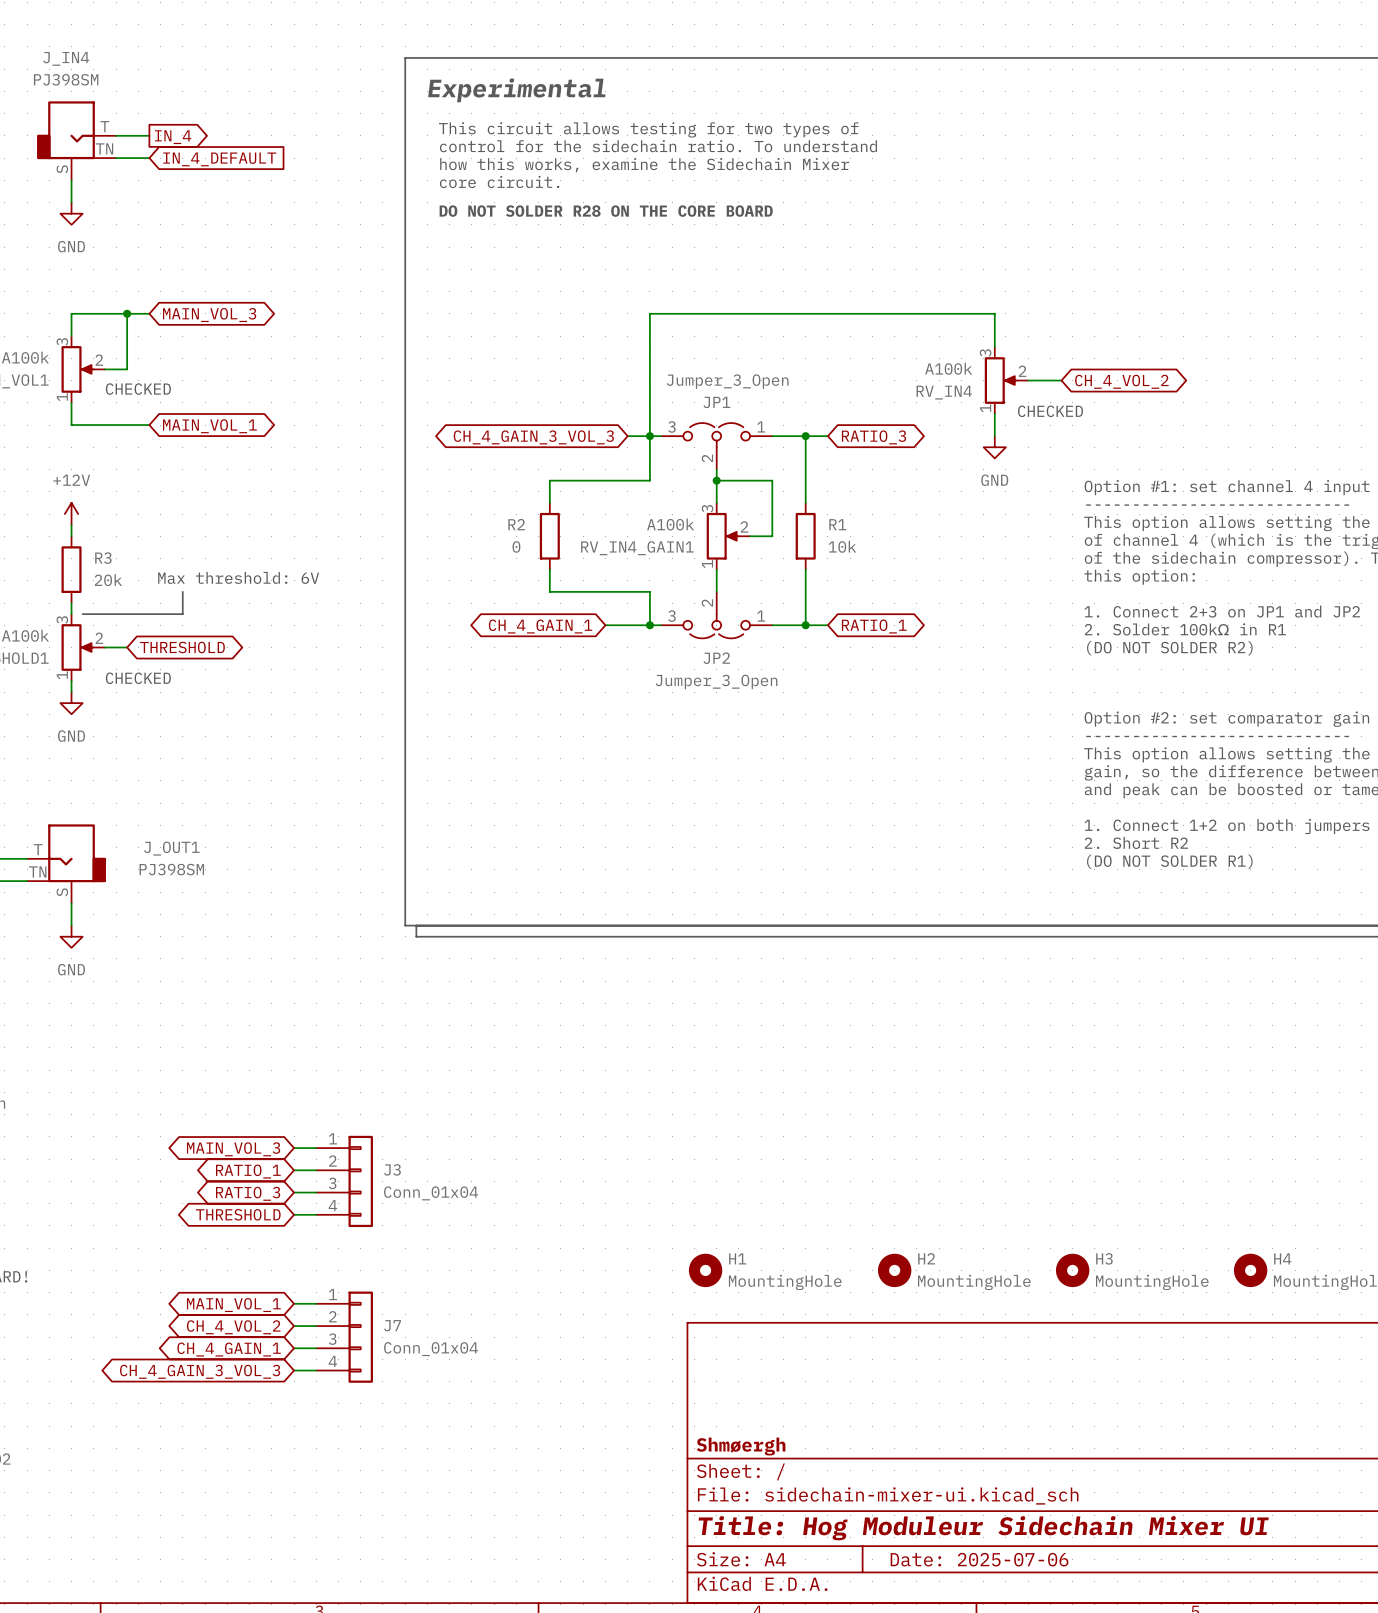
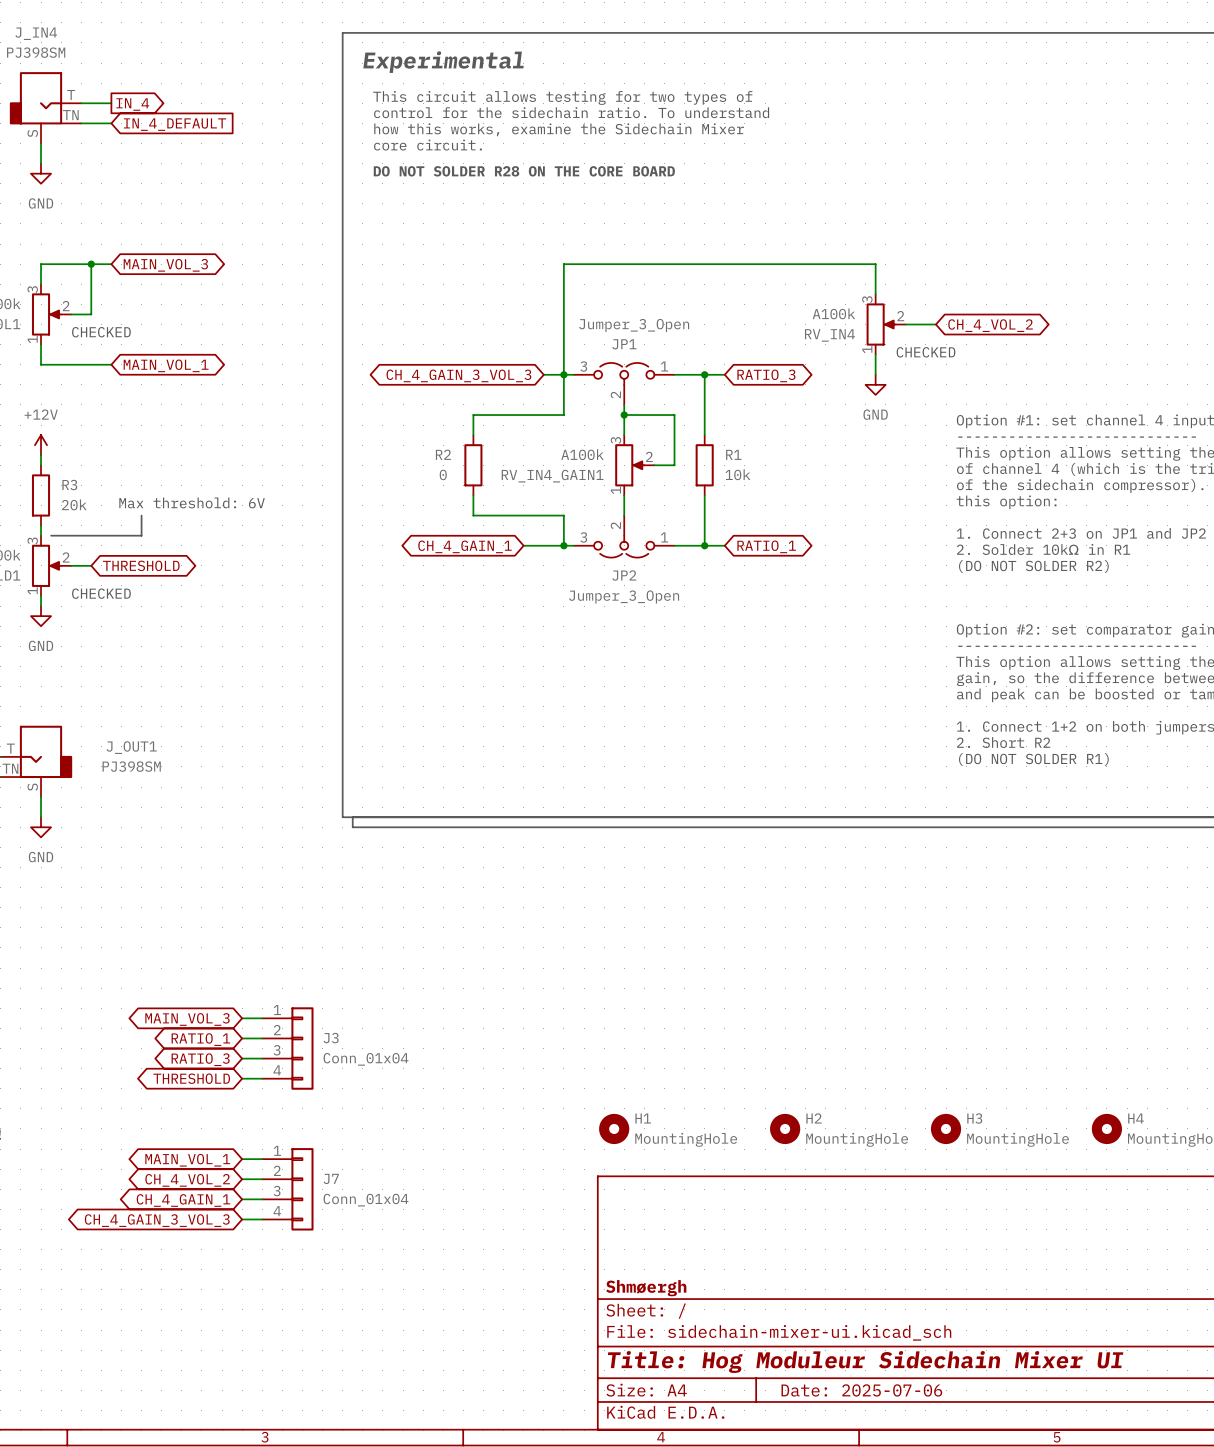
text: 2. Solder 100kΩ in R1 (1185, 629) -> 2. Solder 10kΩ in R1 (1043, 549)

